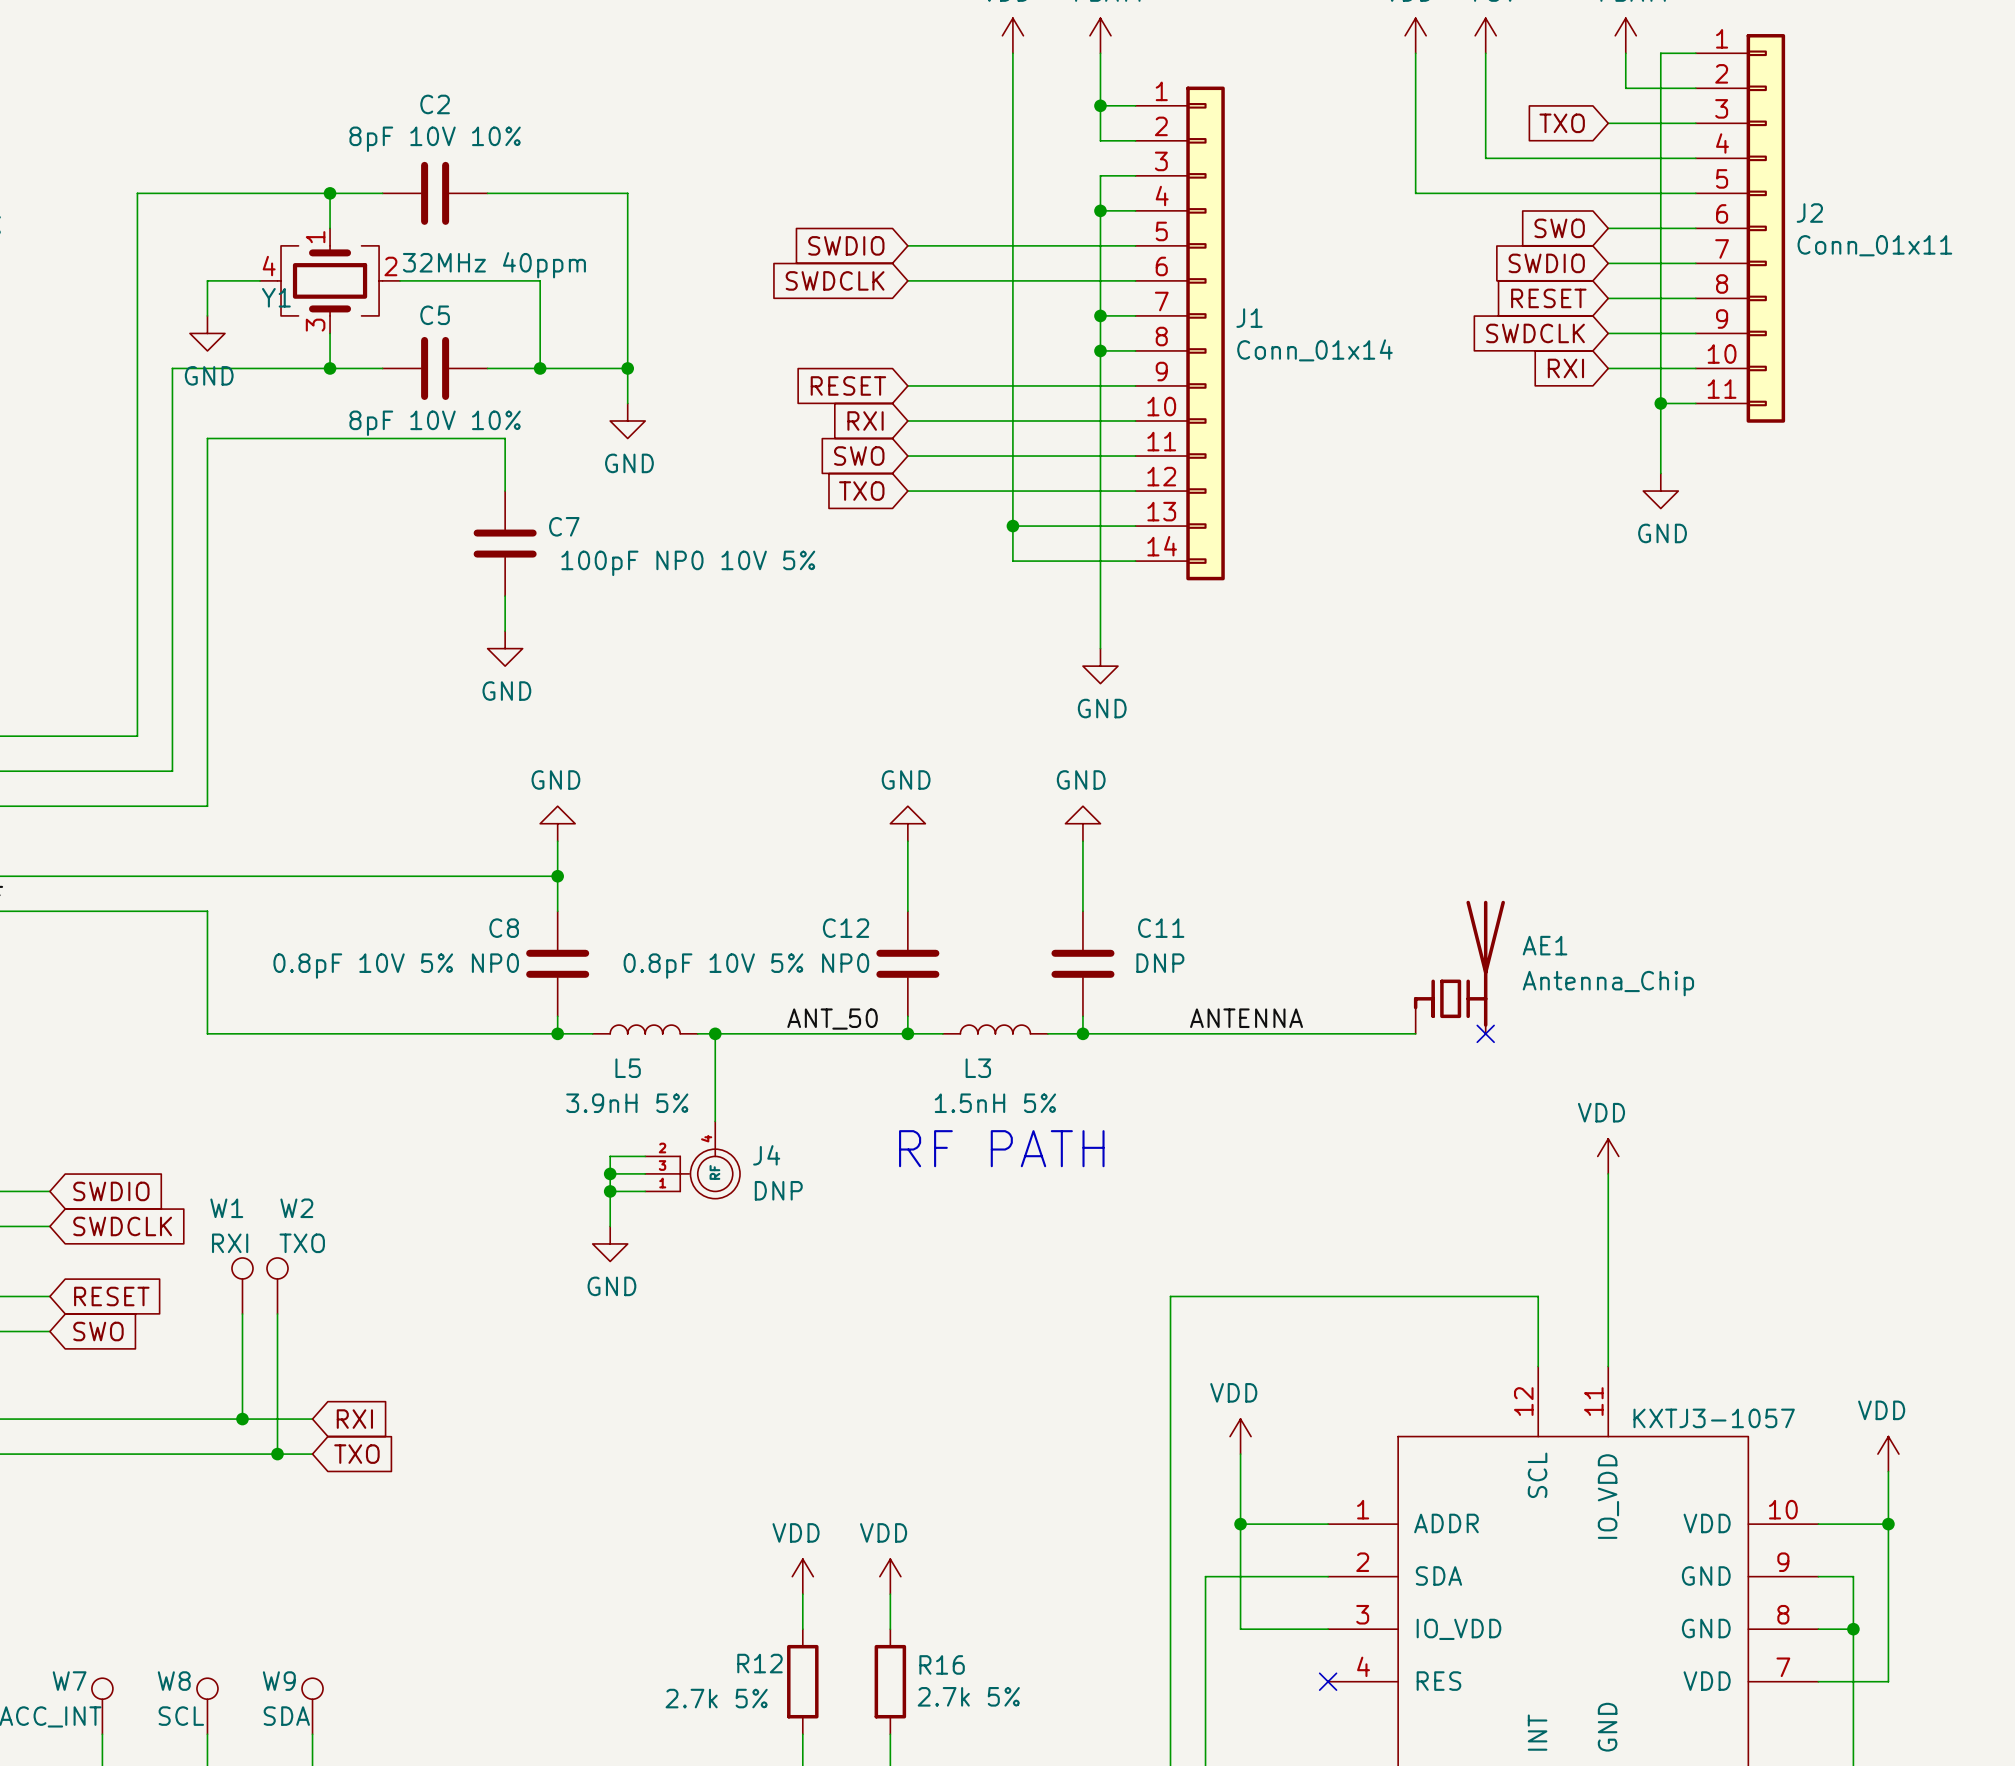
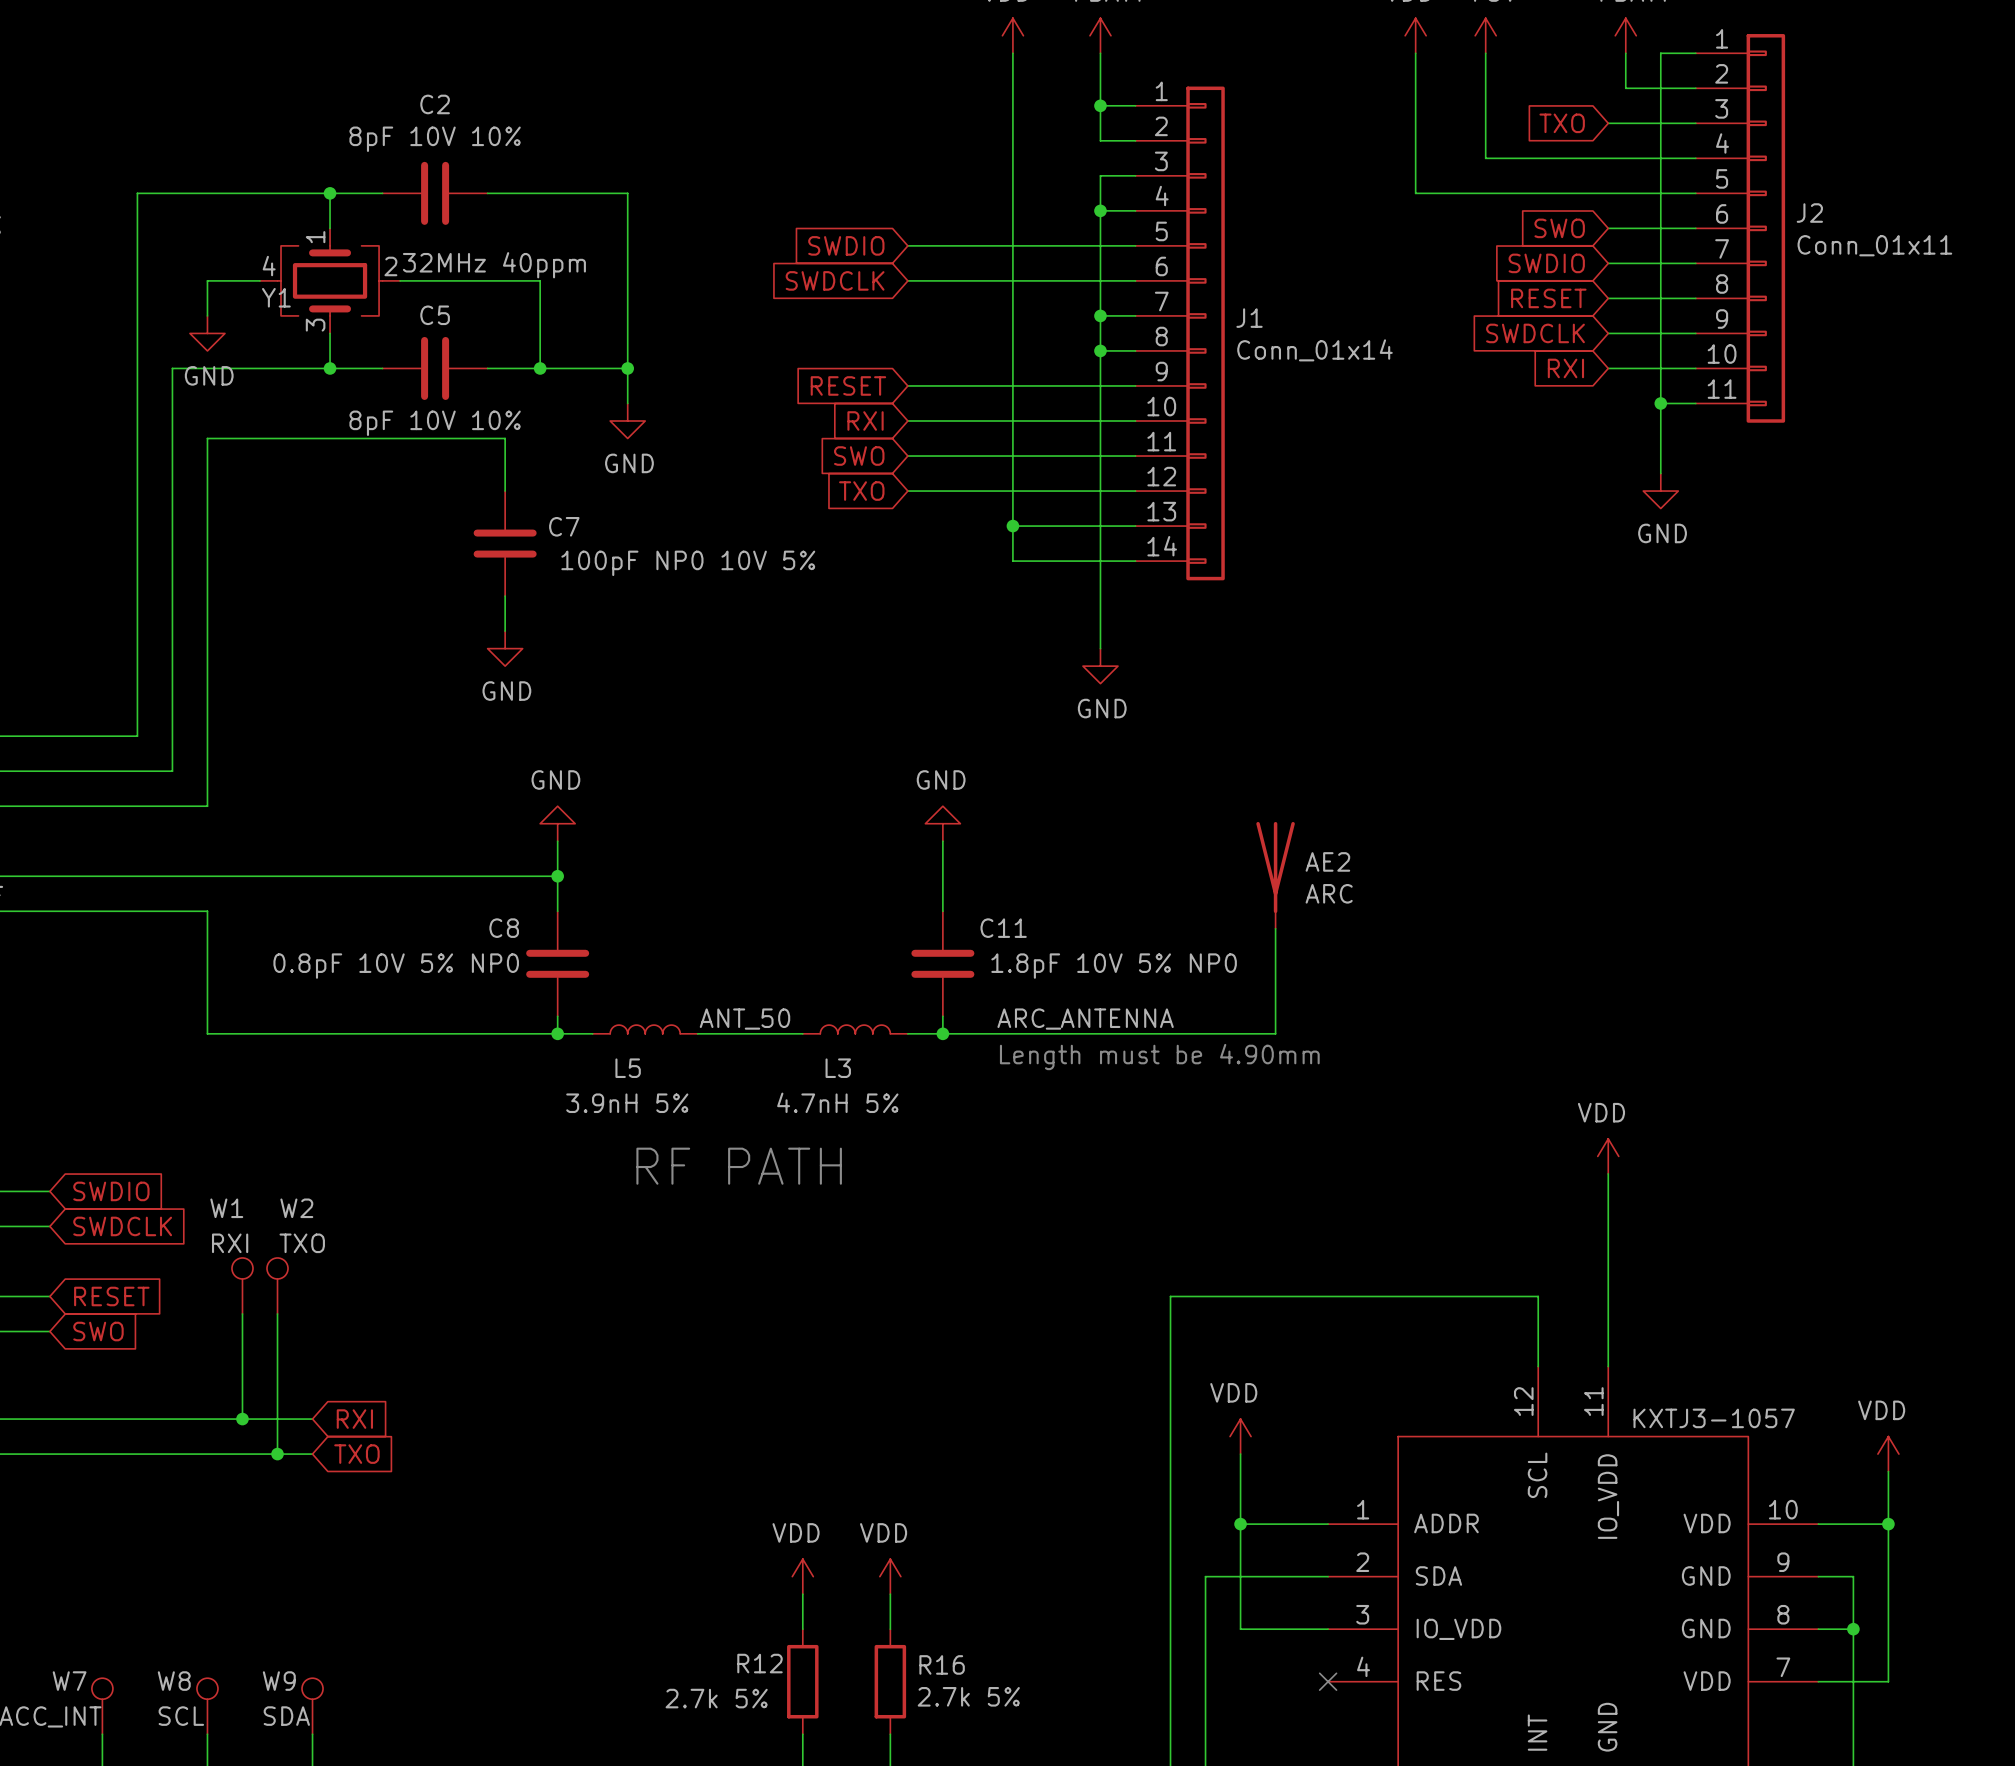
power symbol position: GND (907, 823) -> GND (942, 823)
power symbol: GND (1082, 823) -> none
wire: (907, 841) (907, 911) -> (942, 841) (942, 911)
wire: (1082, 841) (1082, 911) -> none
AE2: none -> ARC (1275, 875)
C11 name position: C11 (1161, 928) -> C11 (1003, 928)
C12: 0.8pF 10V 5% NP0 (907, 963) -> none
C11 position: (1082, 963) -> (942, 963)
C11 value: DNP (1160, 963) -> 1.8pF 10V 5% NP0 (1114, 966)
AE1: Antenna_Chip (1459, 967) -> none
wire: (907, 1016) (907, 1033) (802, 1033) -> none
wire: none -> (942, 1016) (942, 1033) (1047, 1033)
wire: (1082, 1016) (1082, 1033) -> none
label: ANTENNA (1246, 1018) -> ARC_ANTENNA (1085, 1019)
label position: ANT_50 (832, 1019) -> ANT_50 (744, 1019)
L3 position: (995, 1029) -> (855, 1029)
wire: (715, 1033) (715, 1121) -> none
junction: (715, 1033) -> none
junction position: (907, 1033) -> (942, 1033)
junction: (1082, 1033) -> none
wire: (1275, 1033) (1415, 1033) -> (1275, 1033) (1275, 928)
no-connect mark: (1485, 1033) -> none
text: none -> Length must be 4.90mm (1159, 1057)
L3 value: 1.5nH 5% (995, 1103) -> 4.7nH 5% (837, 1102)
text position: RF PATH (1001, 1148) -> RF PATH (739, 1166)
wire: (645, 1156) (610, 1156) (610, 1226) -> none
J4: DNP (692, 1160) -> none
wire: (610, 1173) (645, 1173) -> none
junction: (610, 1173) -> none
wire: (610, 1191) (645, 1191) -> none
junction: (610, 1191) -> none
power symbol: GND (610, 1243) -> none

